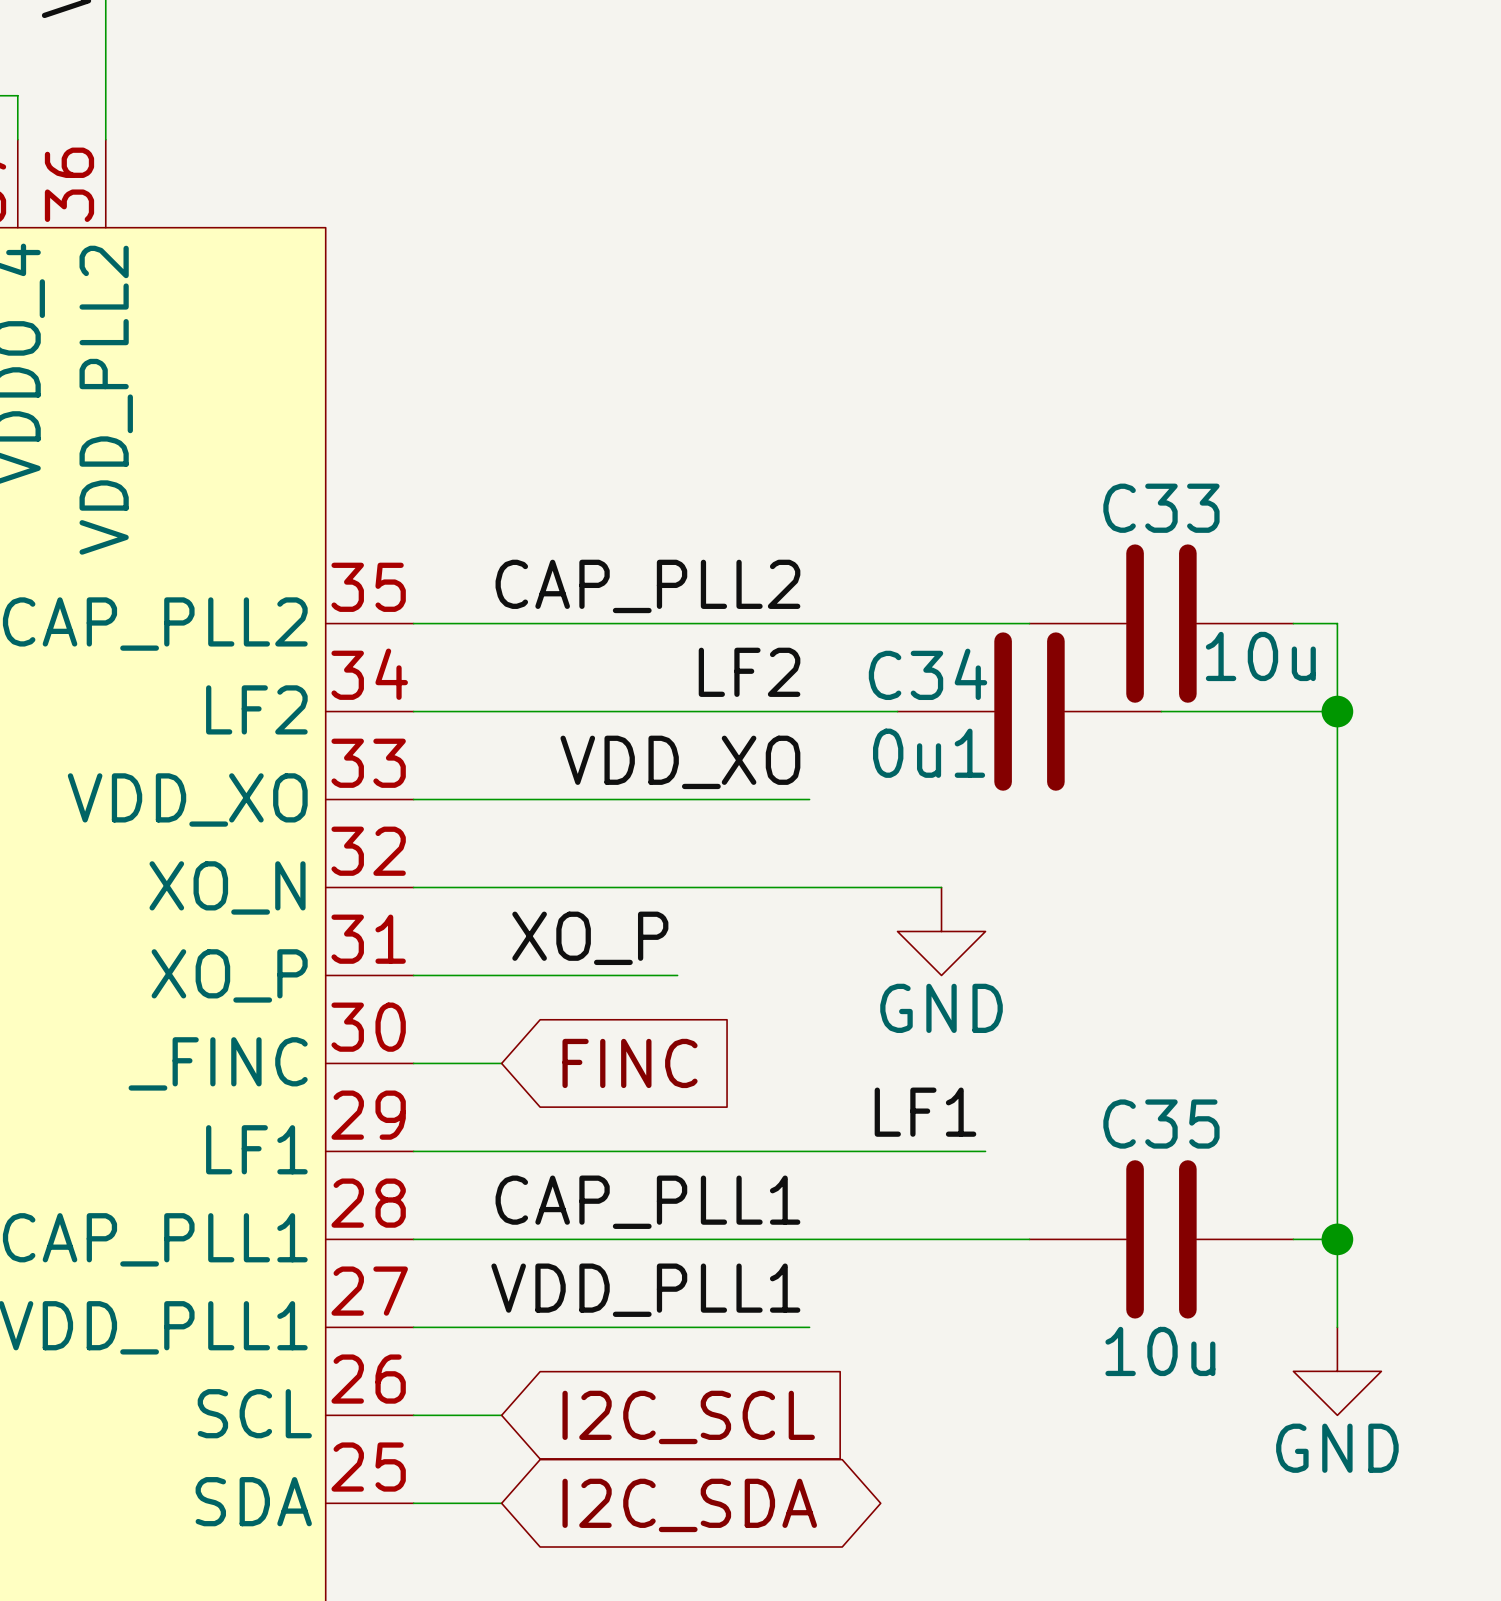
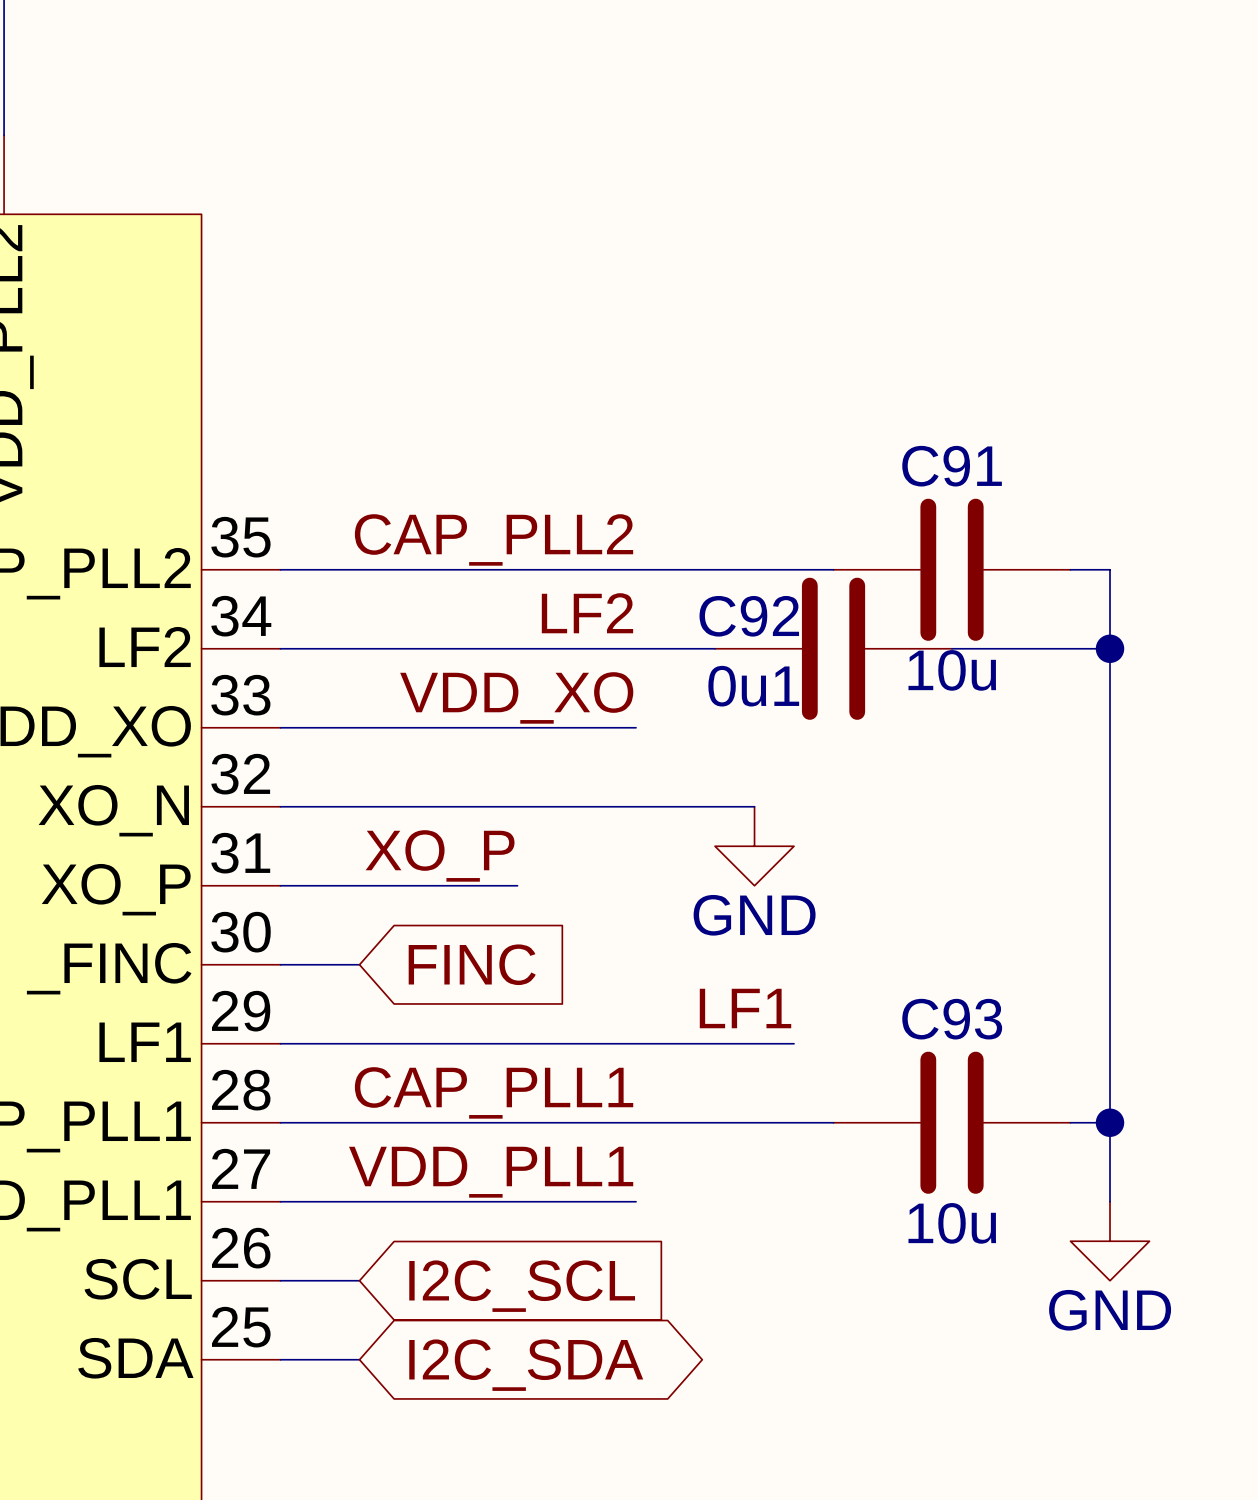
C33 name: C33 (1161, 508) -> C91 (952, 466)
C33 value position: 10u (1260, 656) -> 10u (952, 670)
C34 name: C34 (927, 674) -> C92 (749, 616)
C35 name: C35 (1161, 1124) -> C93 (952, 1019)

